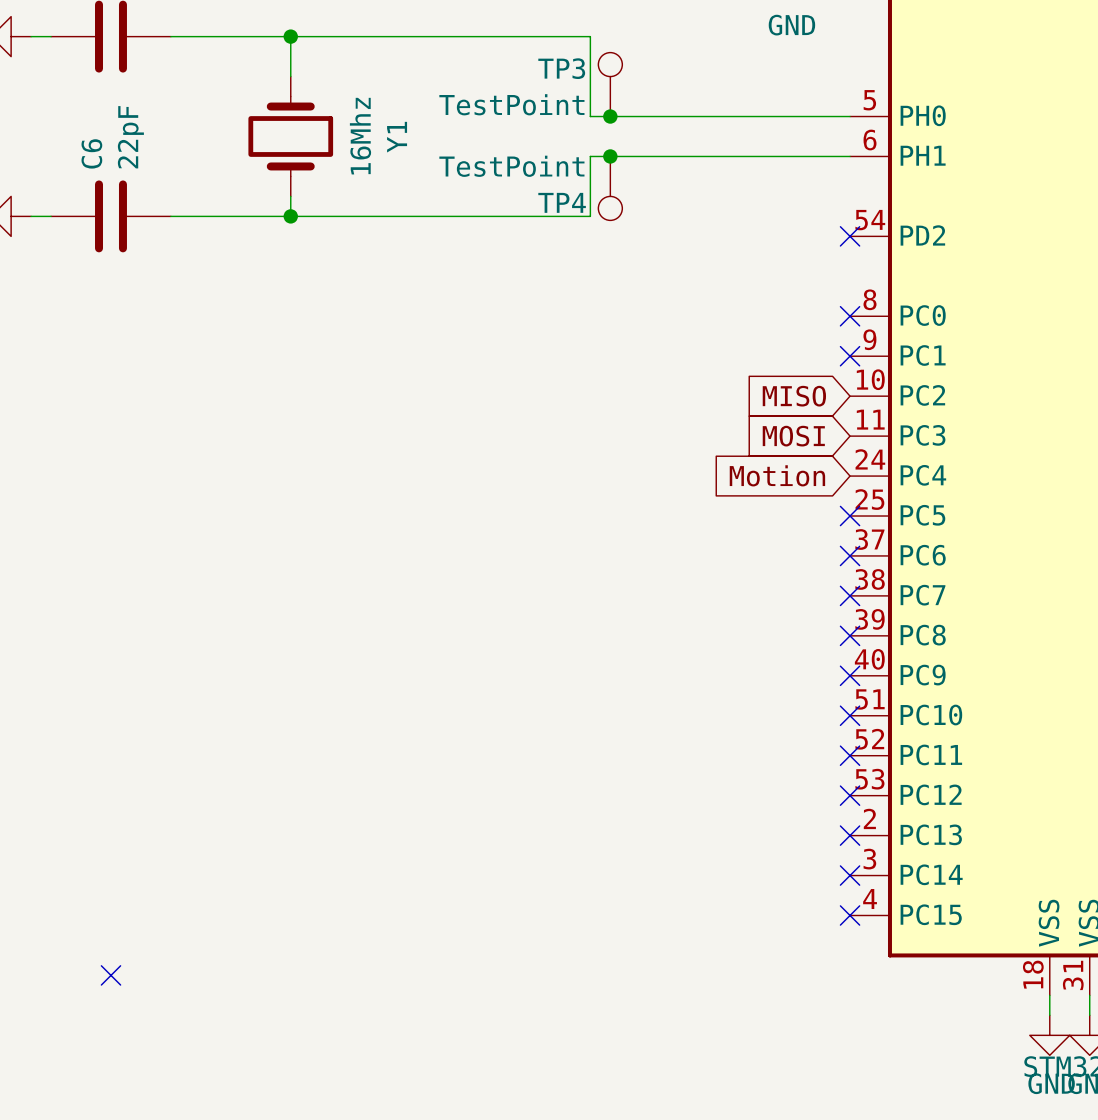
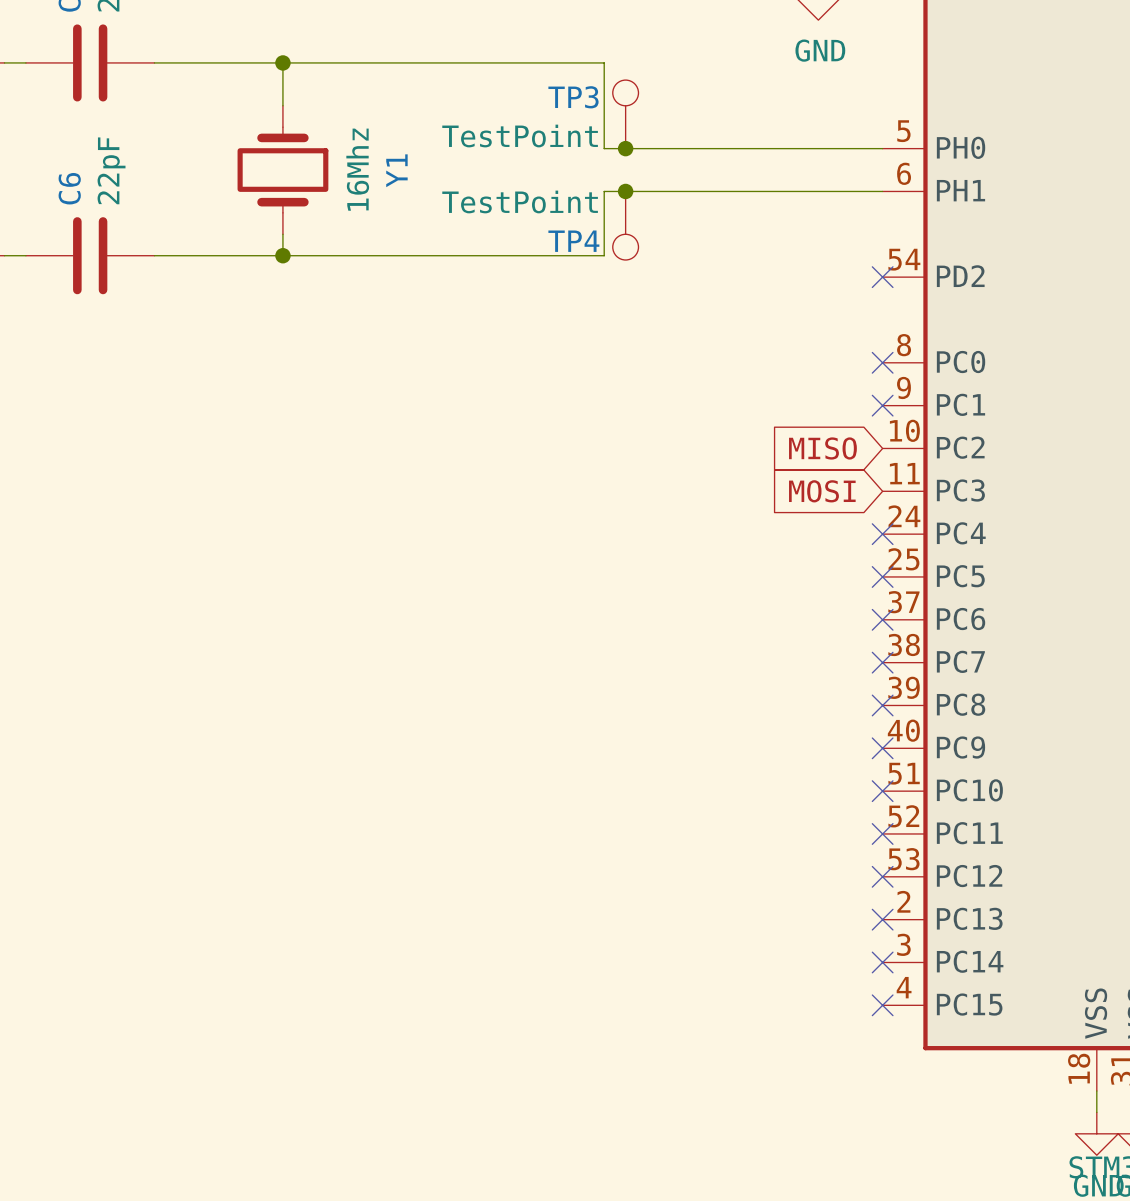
global label: Motion (777, 475) -> none
no-connect mark: none -> (882, 534)
no-connect mark: (110, 975) -> none

